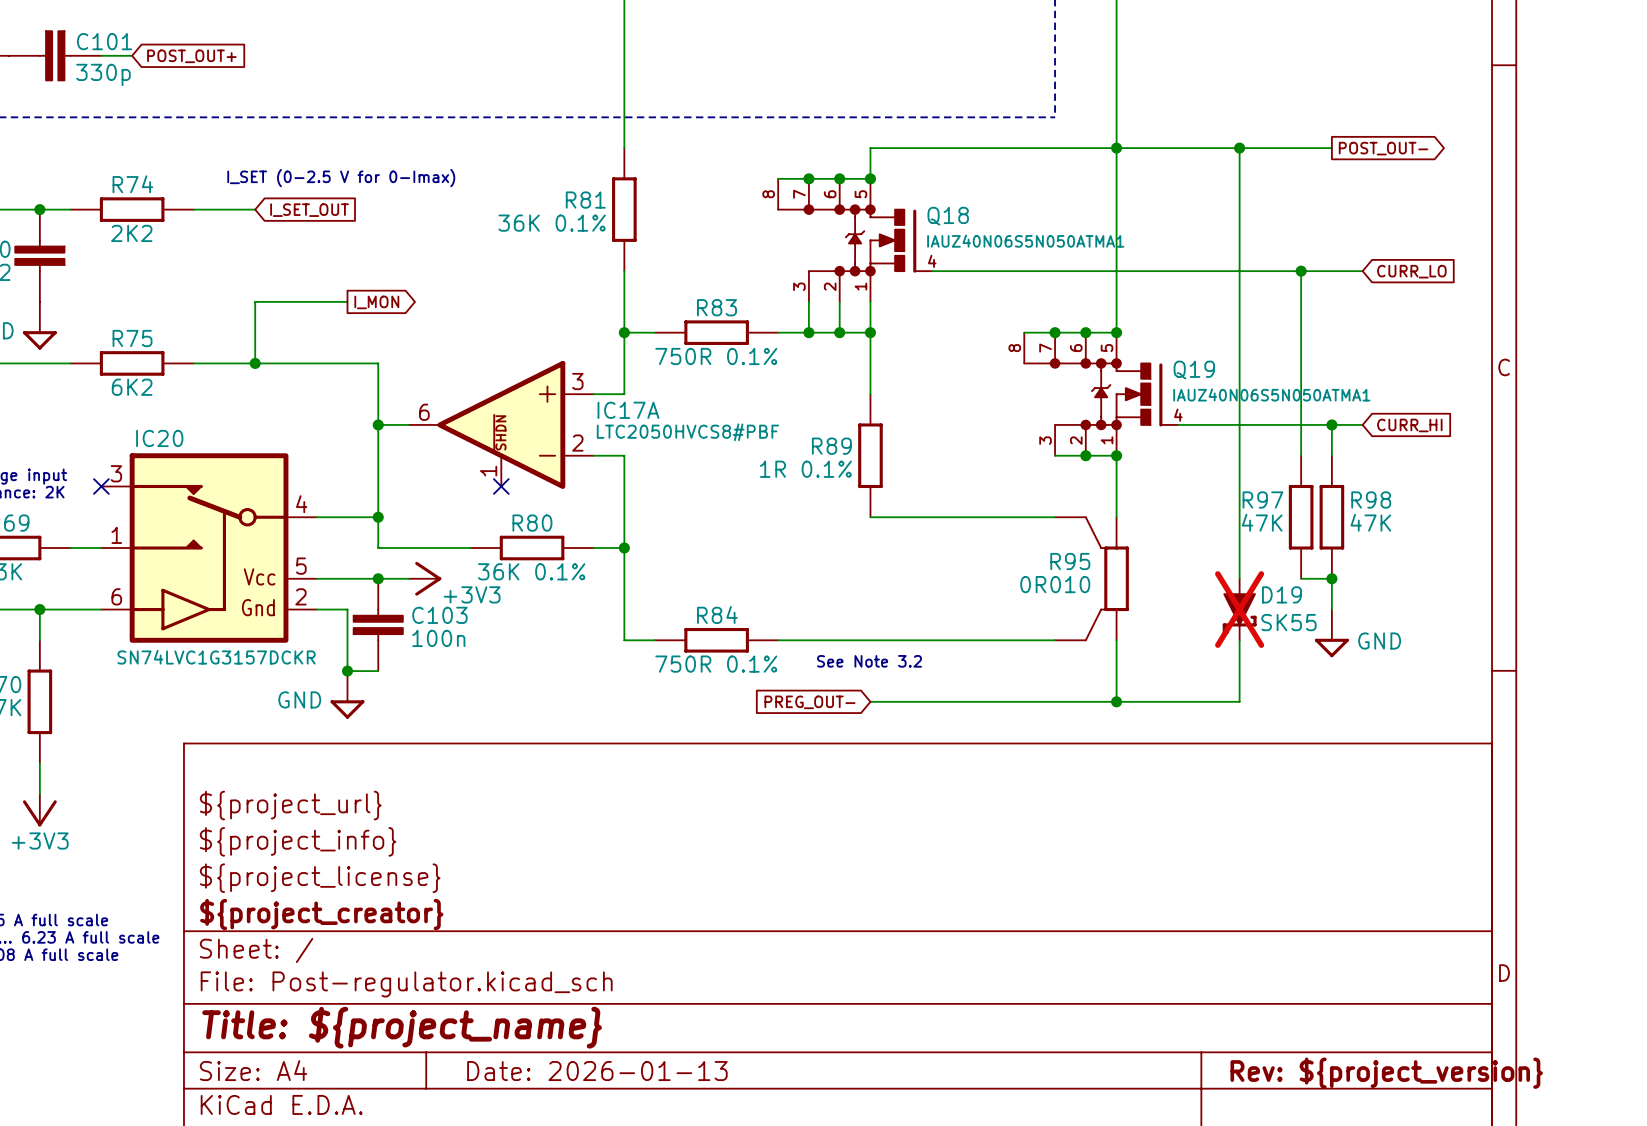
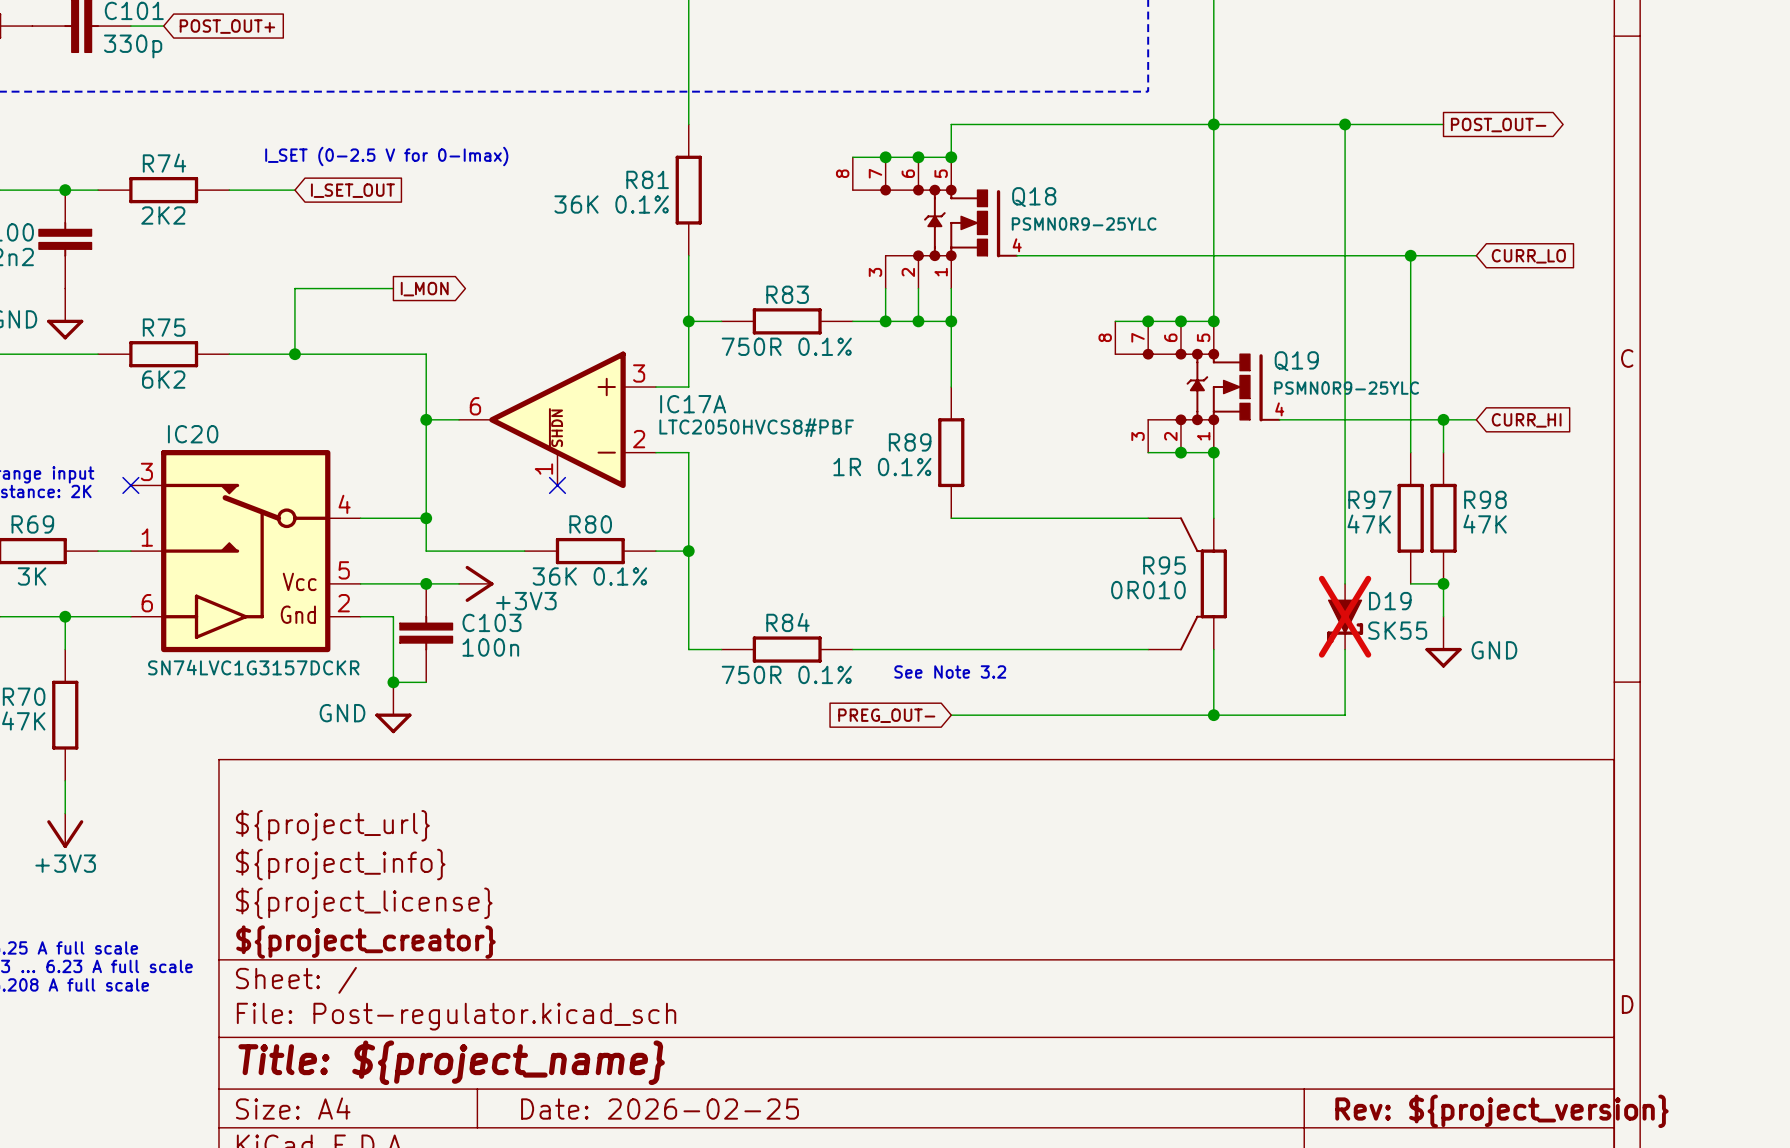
Q18 value: IAUZ40N06S5N050ATMA1 (1025, 241) -> PSMN0R9-25YLC (1084, 223)
Q19 value: IAUZ40N06S5N050ATMA1 (1271, 394) -> PSMN0R9-25YLC (1346, 388)
title block: Date: 2026-01-13 (597, 1071) -> Date: 2026-02-25 (660, 1109)

